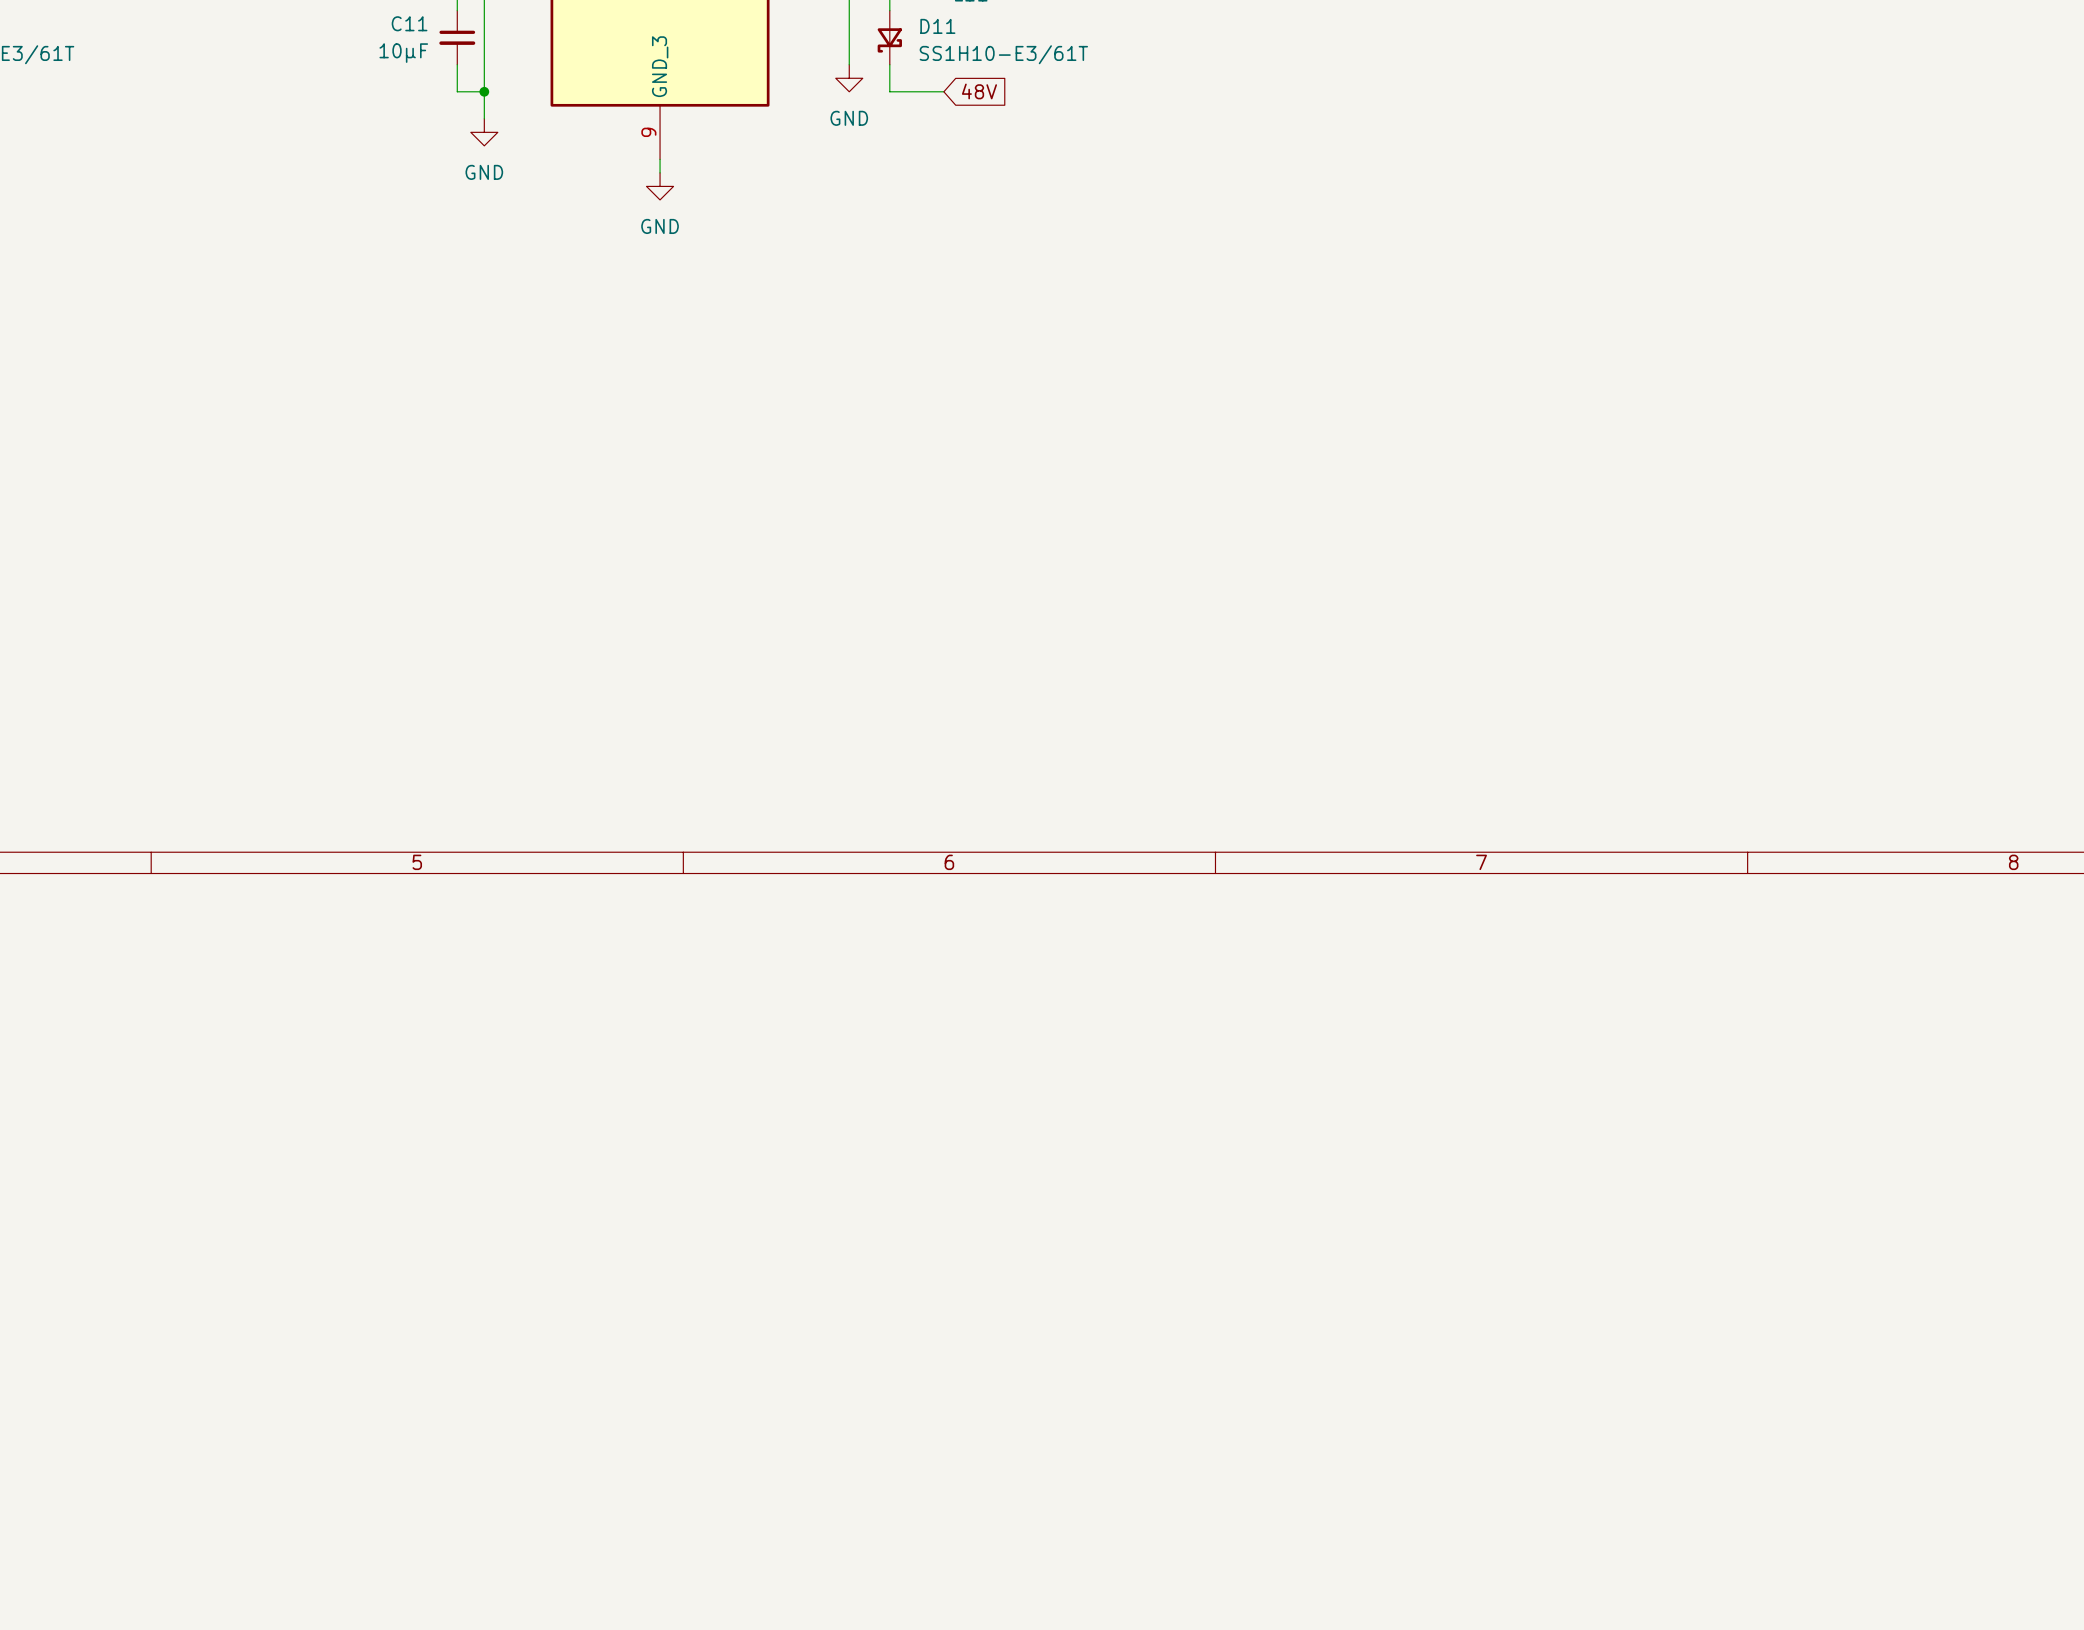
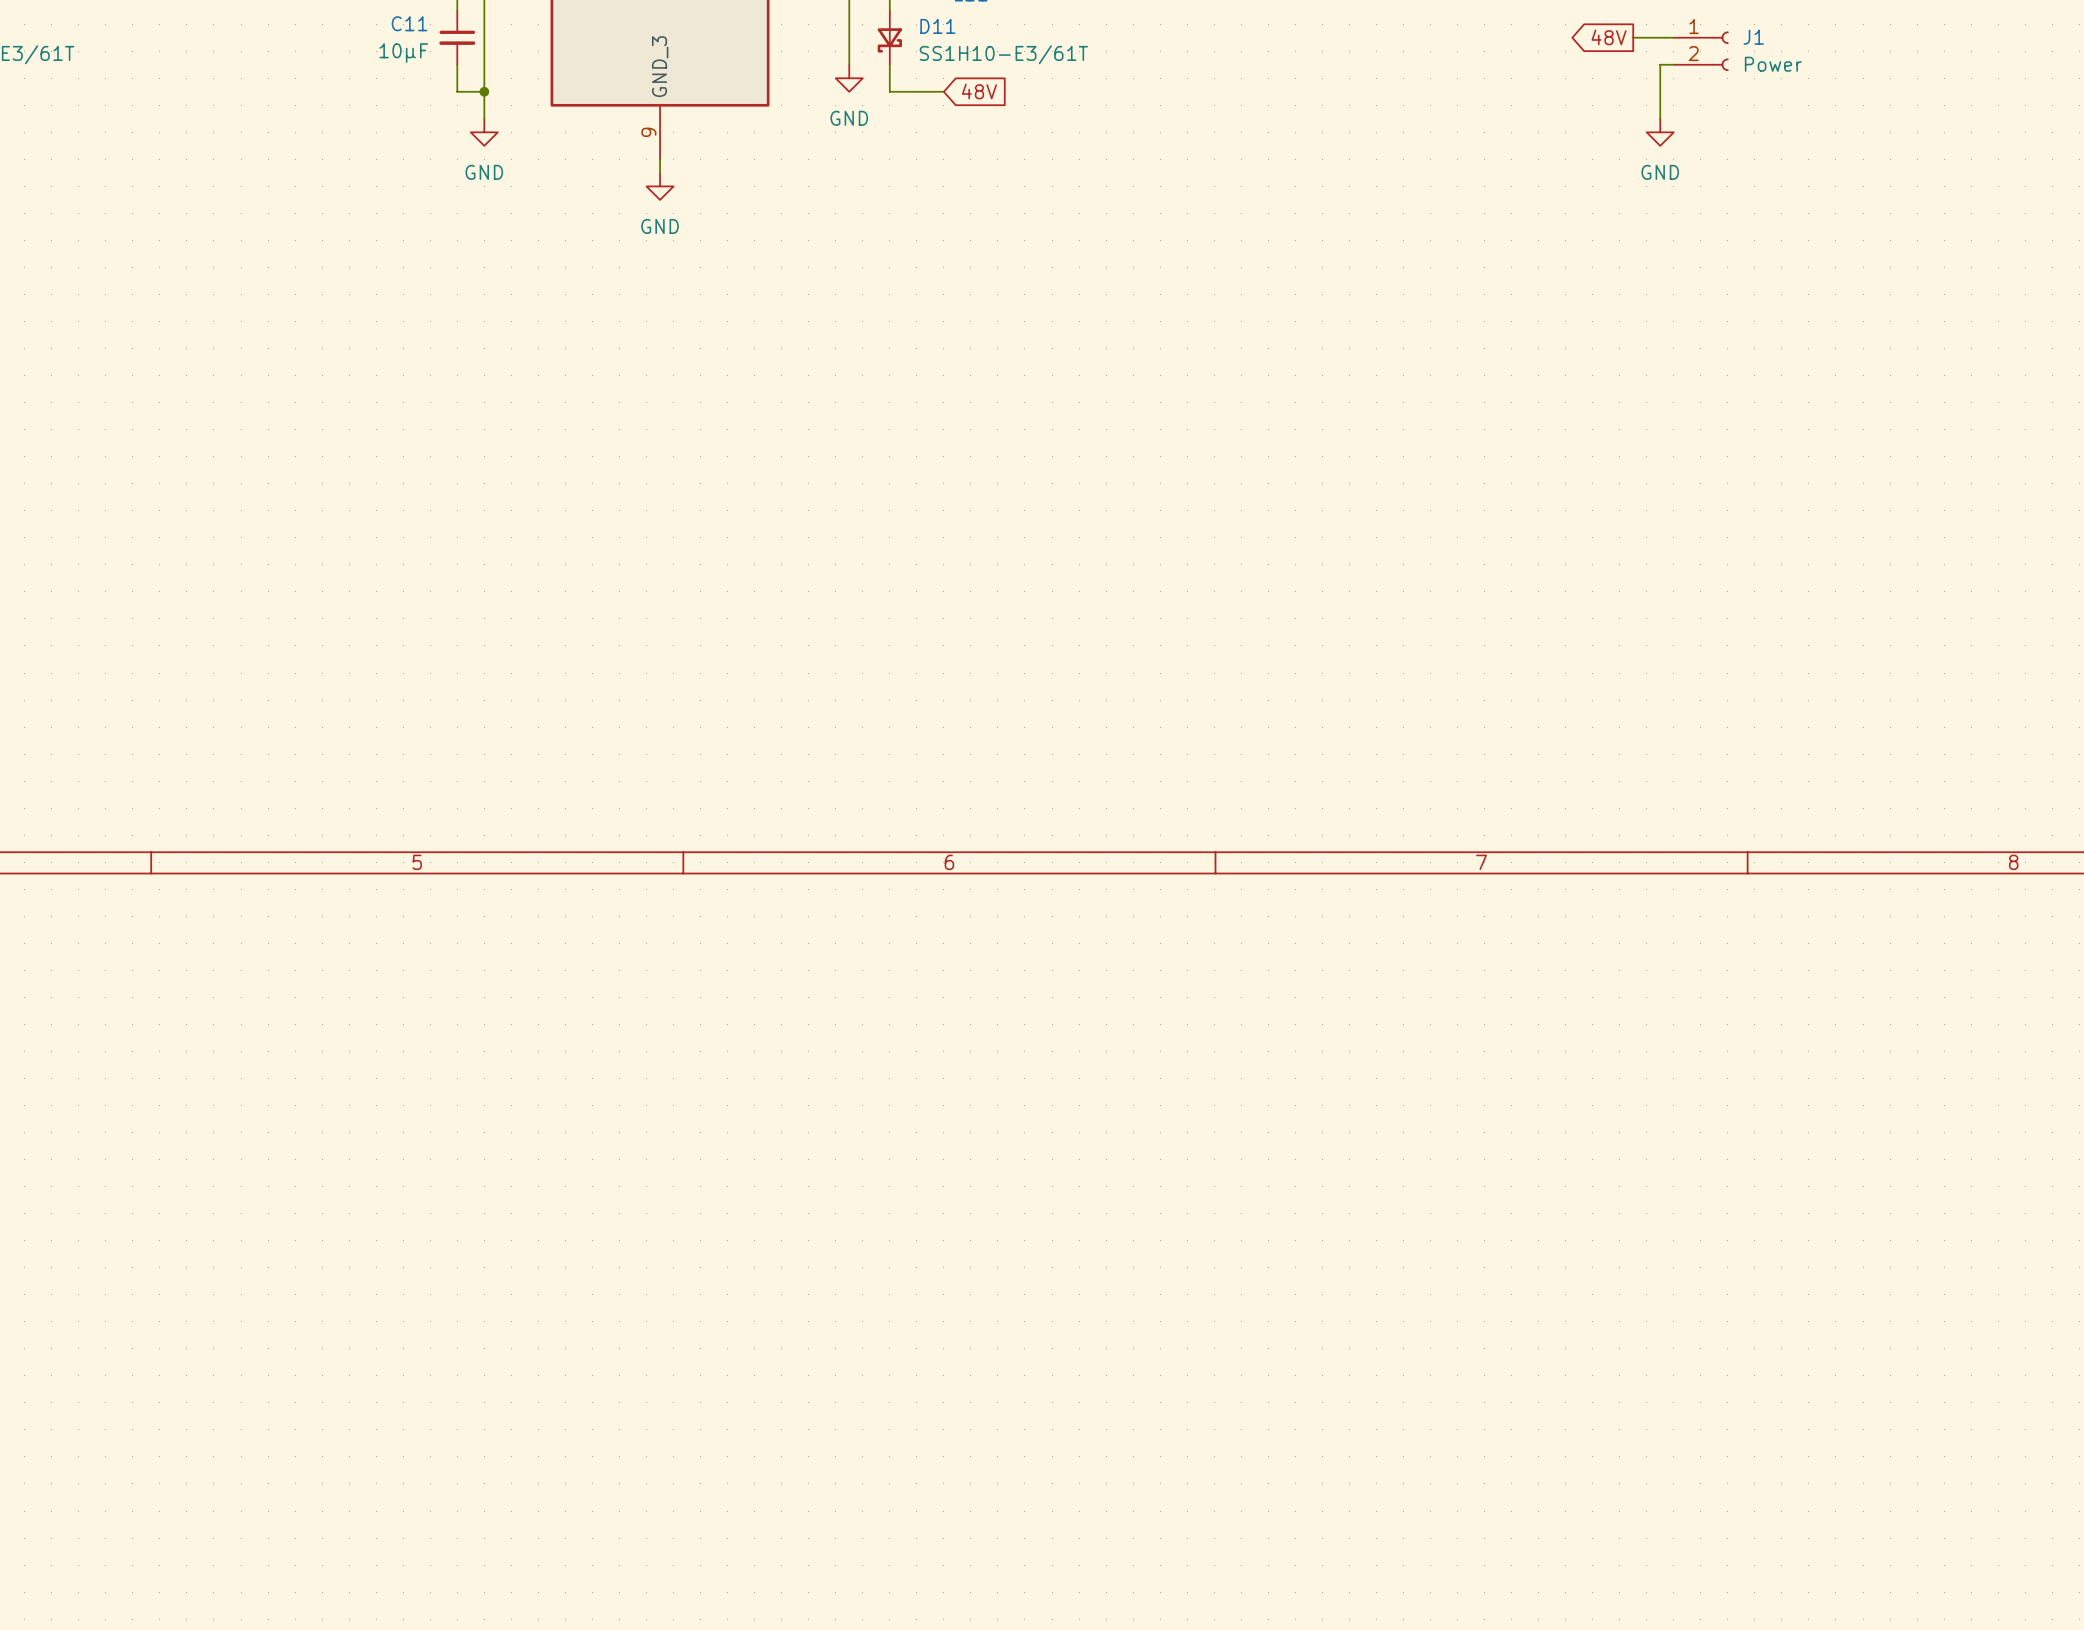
global label: none -> 48V (1609, 37)
wire: none -> (1633, 37) (1673, 37)
J1: none -> Power (1701, 51)
wire: none -> (1673, 64) (1660, 64) (1660, 118)
power symbol: none -> GND (1660, 132)

